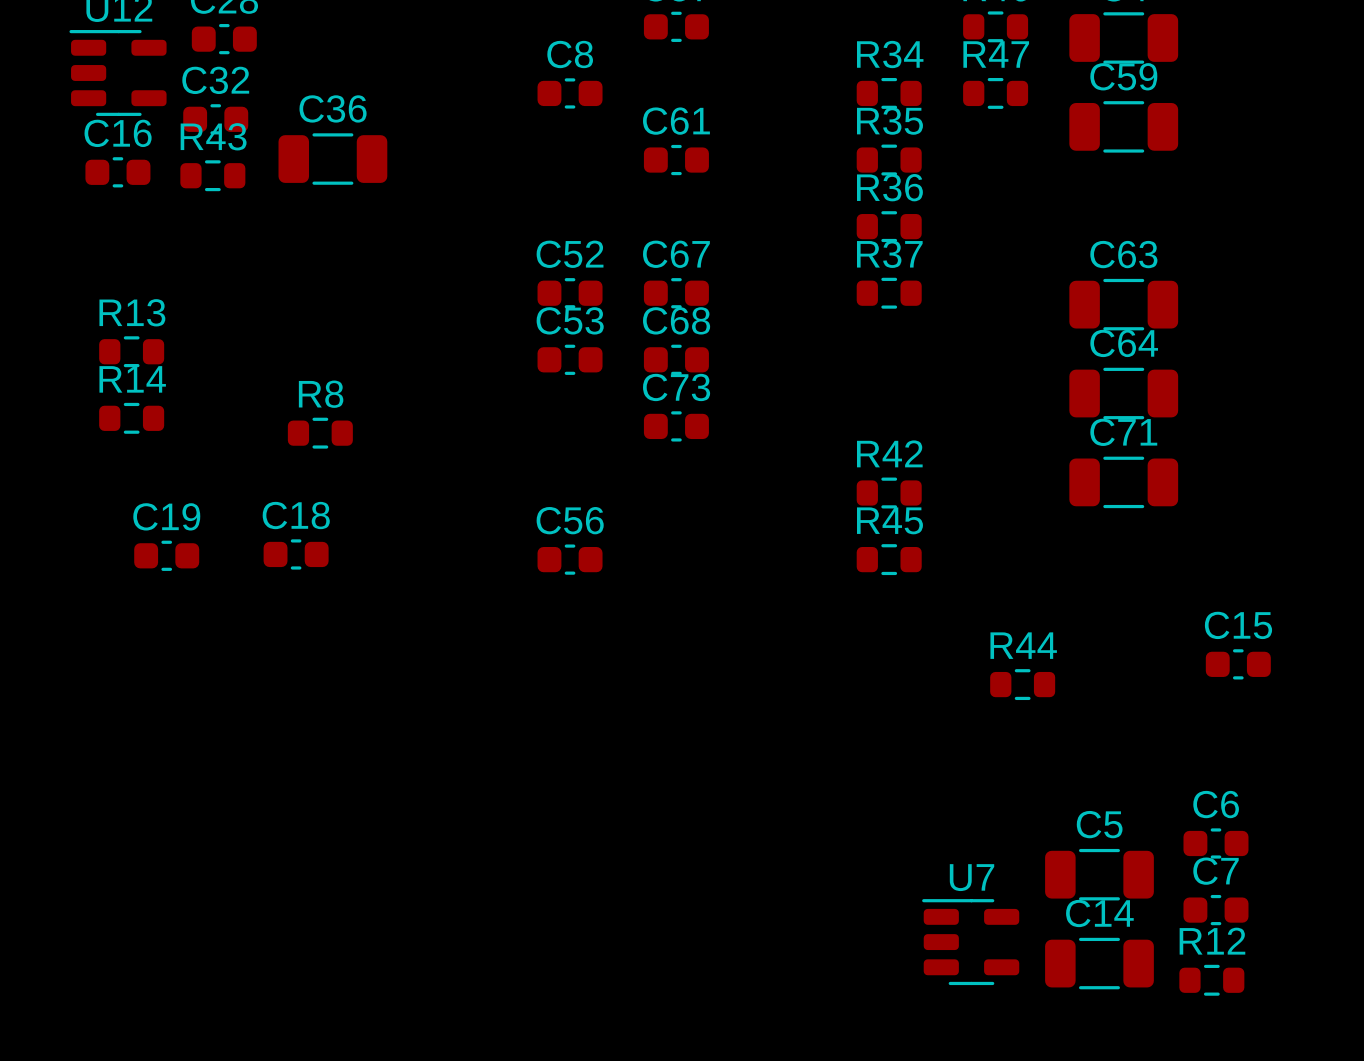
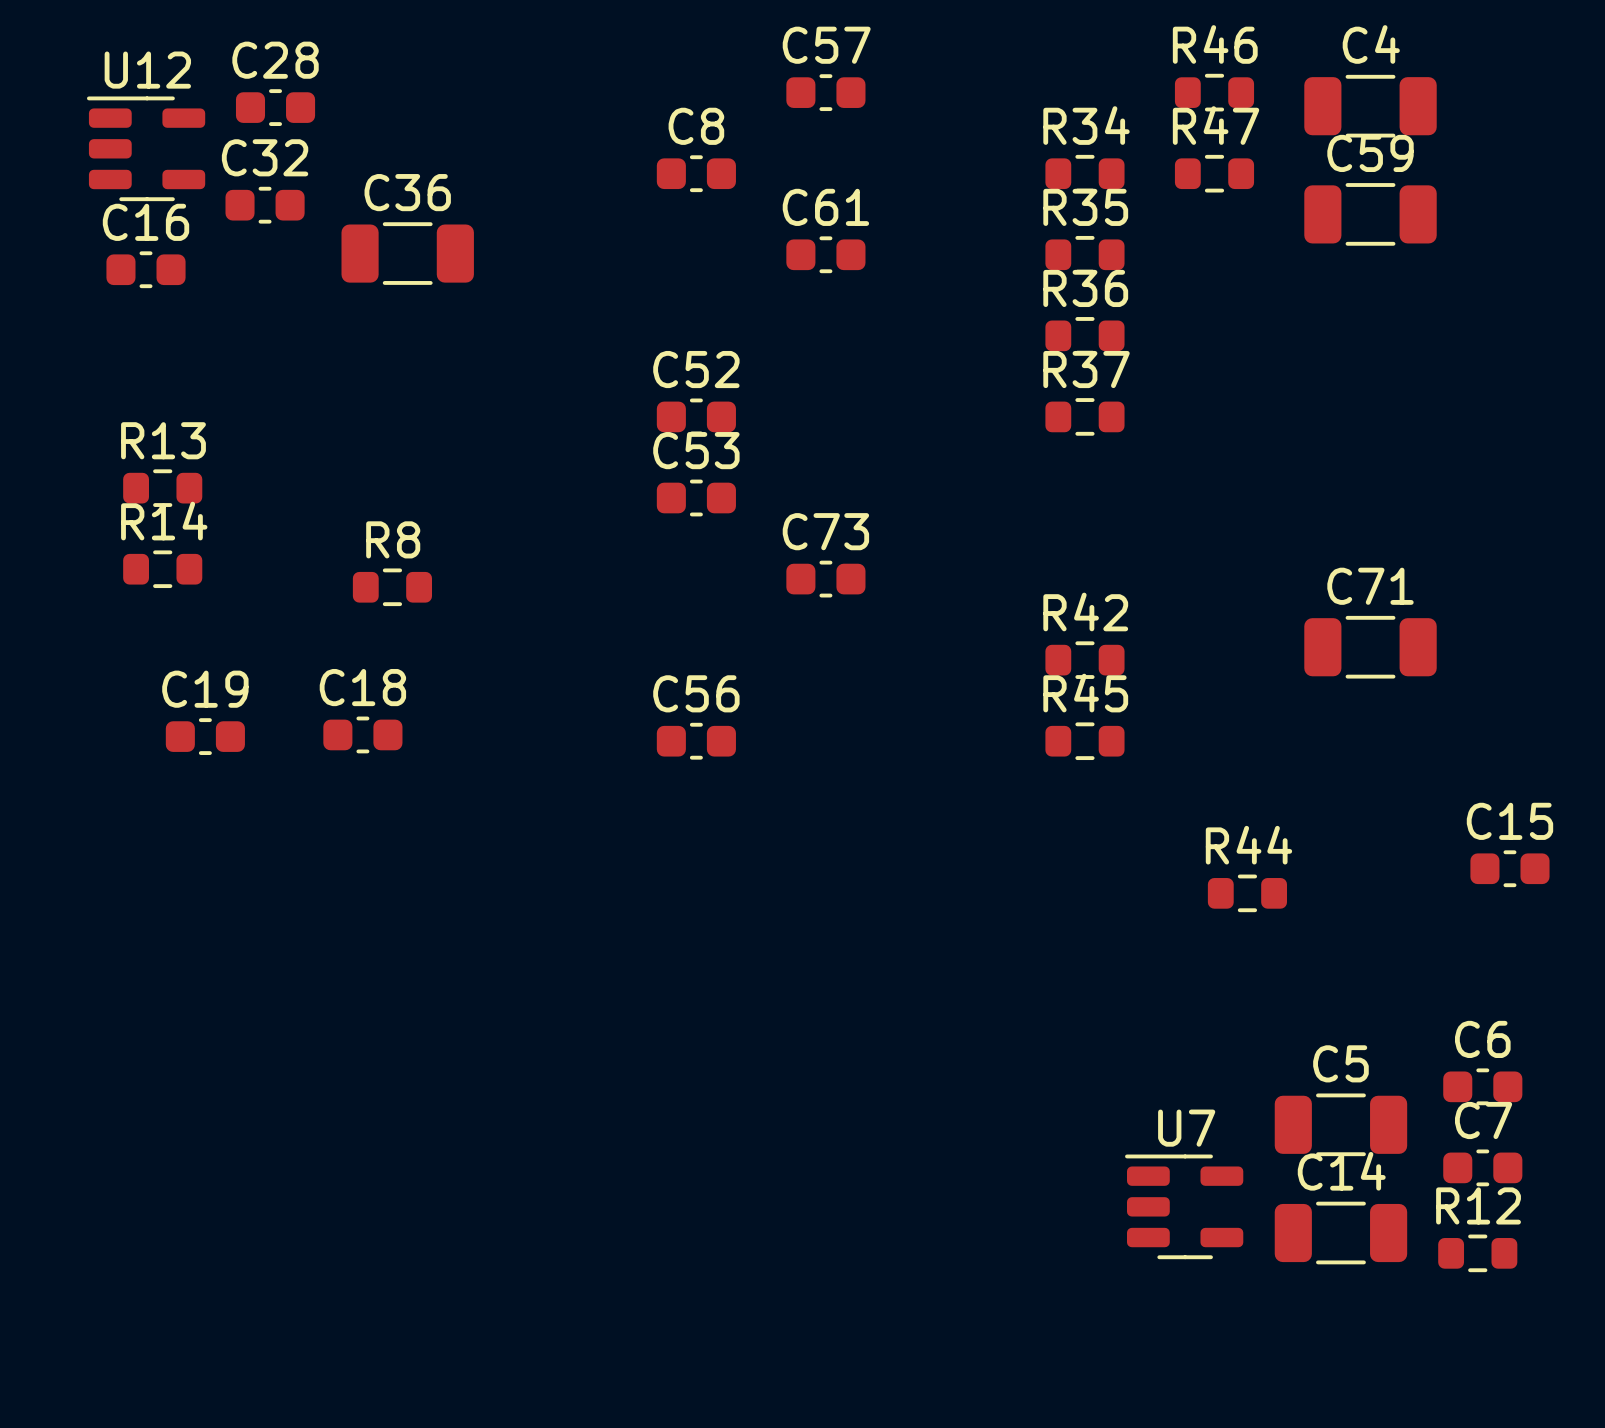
R43: (212, 175) -> none
C67: (676, 293) -> none
C63: (1123, 304) -> none
C68: (676, 359) -> none
C64: (1123, 393) -> none

